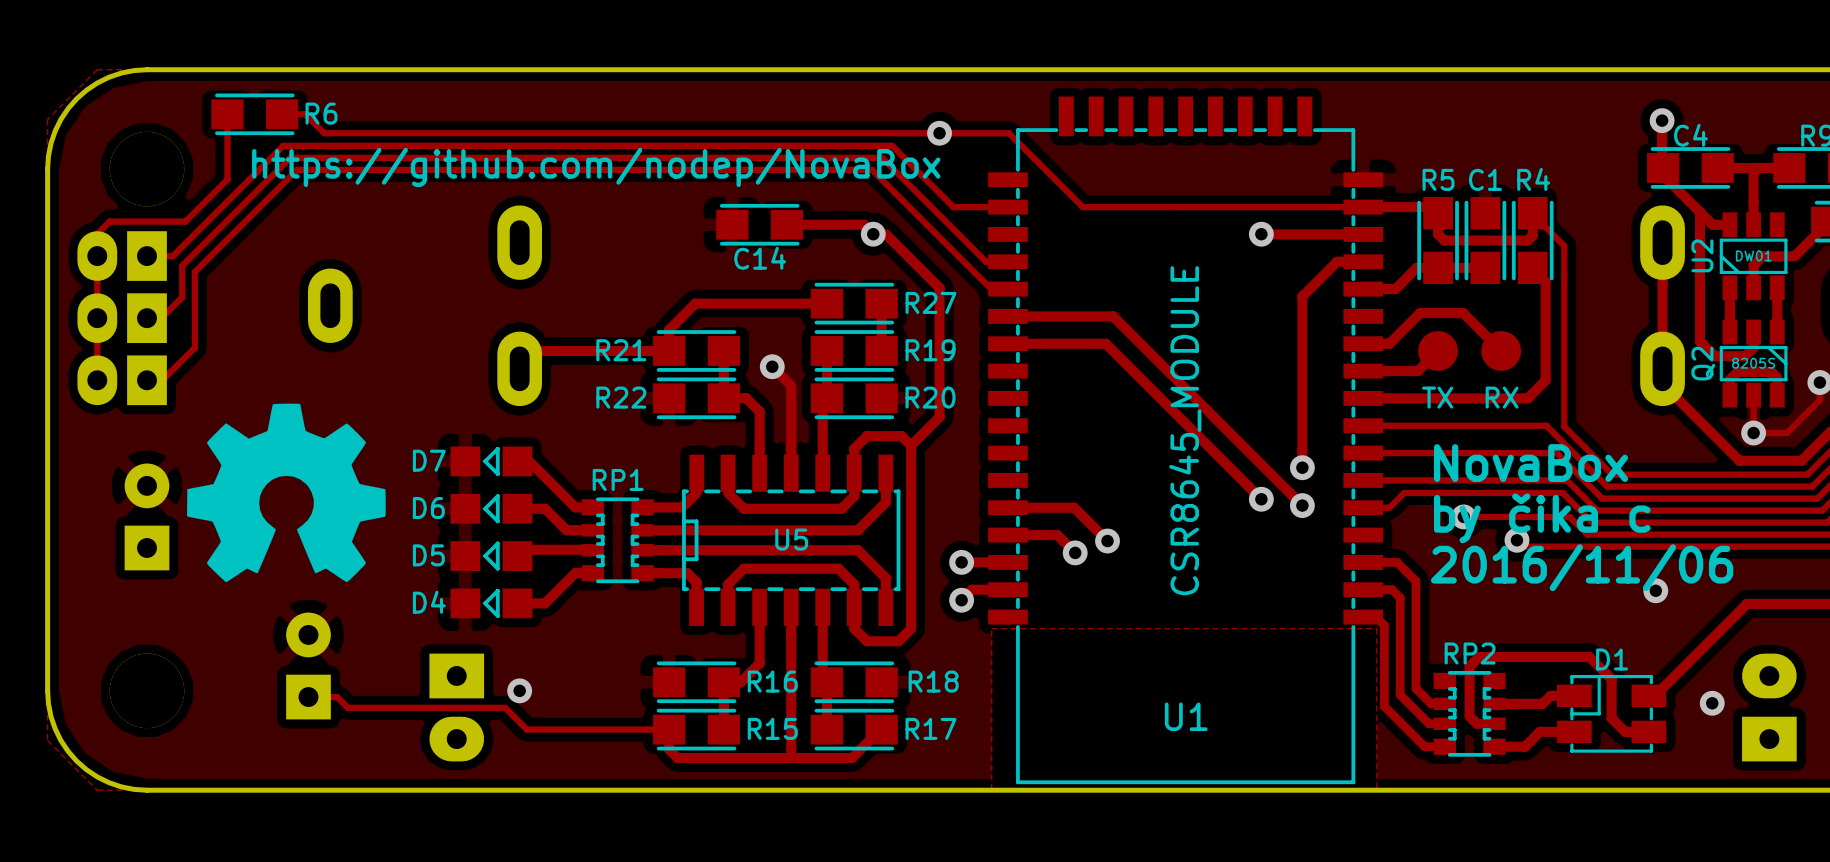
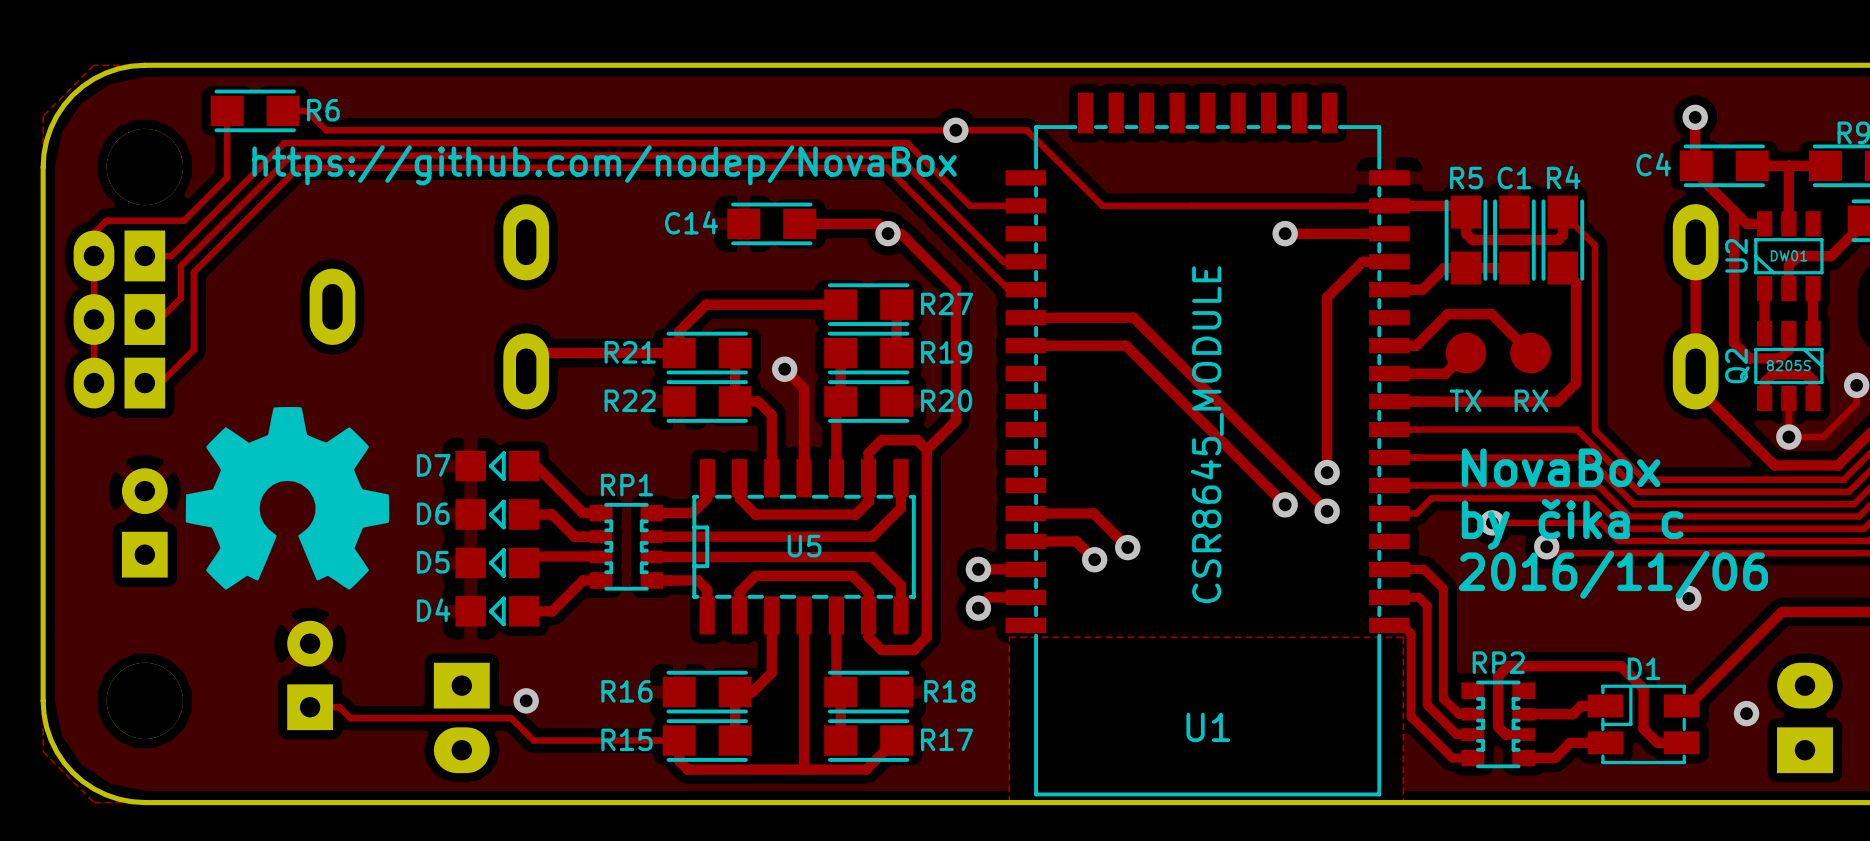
C4 name position: C4 (1690, 135) -> C4 (1653, 164)
C14 name position: C14 (760, 258) -> C14 (691, 222)
R16 name position: R16 (772, 681) -> R16 (626, 691)
R15 name position: R15 (772, 728) -> R15 (626, 739)

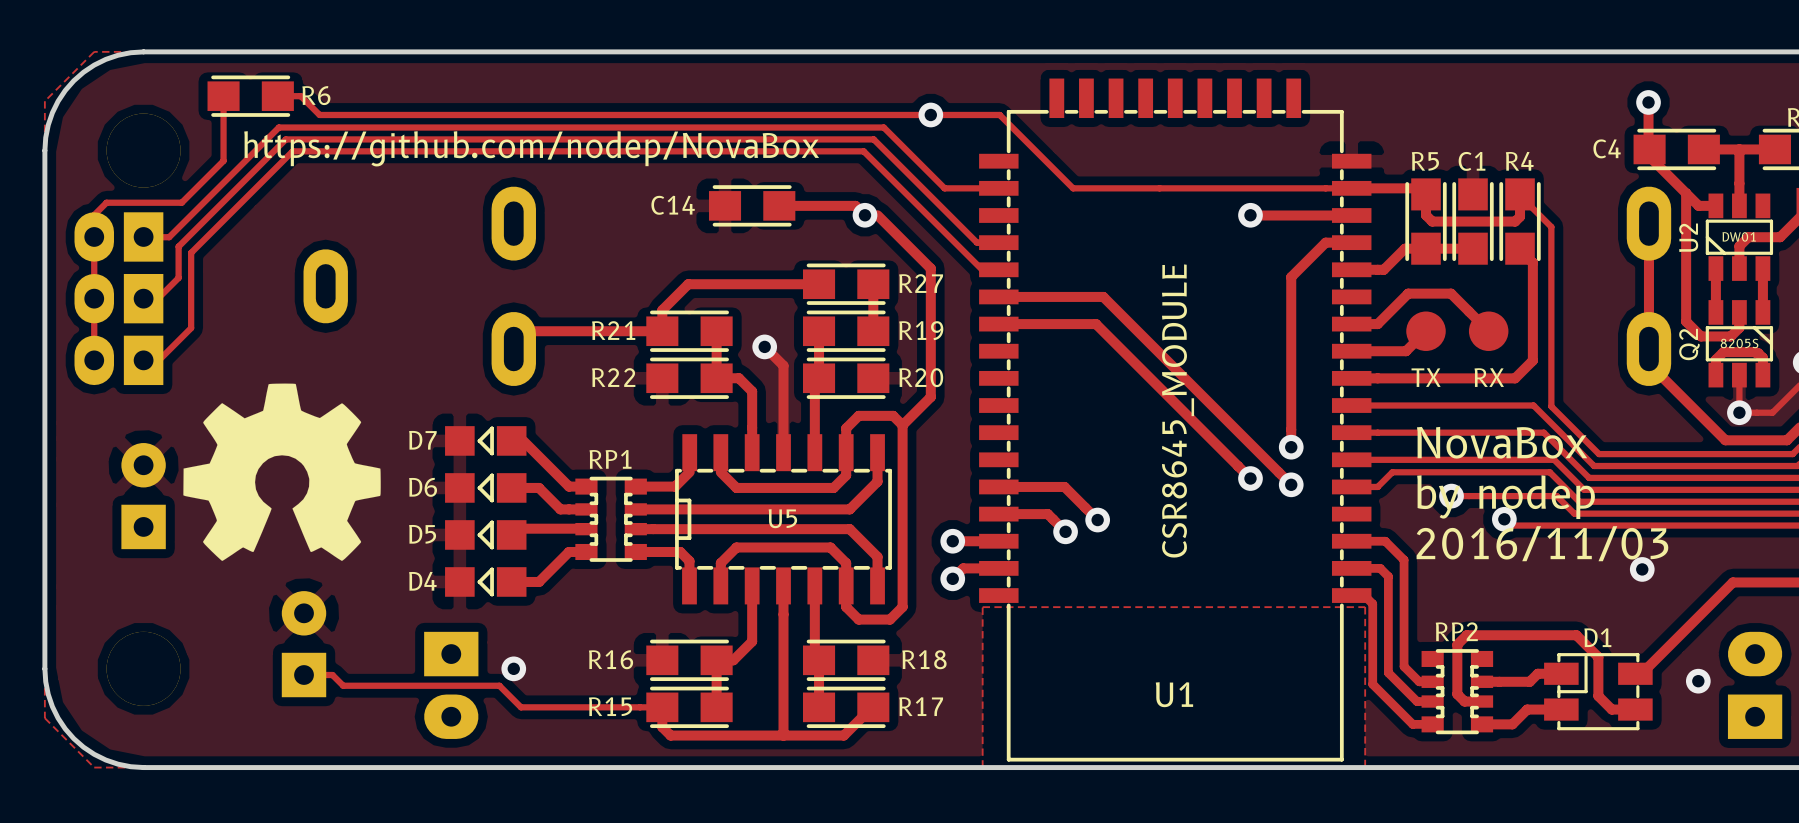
text: by čika c (1572, 524) -> by nodep (1506, 497)
text: 2016/11/06 (1613, 574) -> 2016/11/03 (1542, 543)

